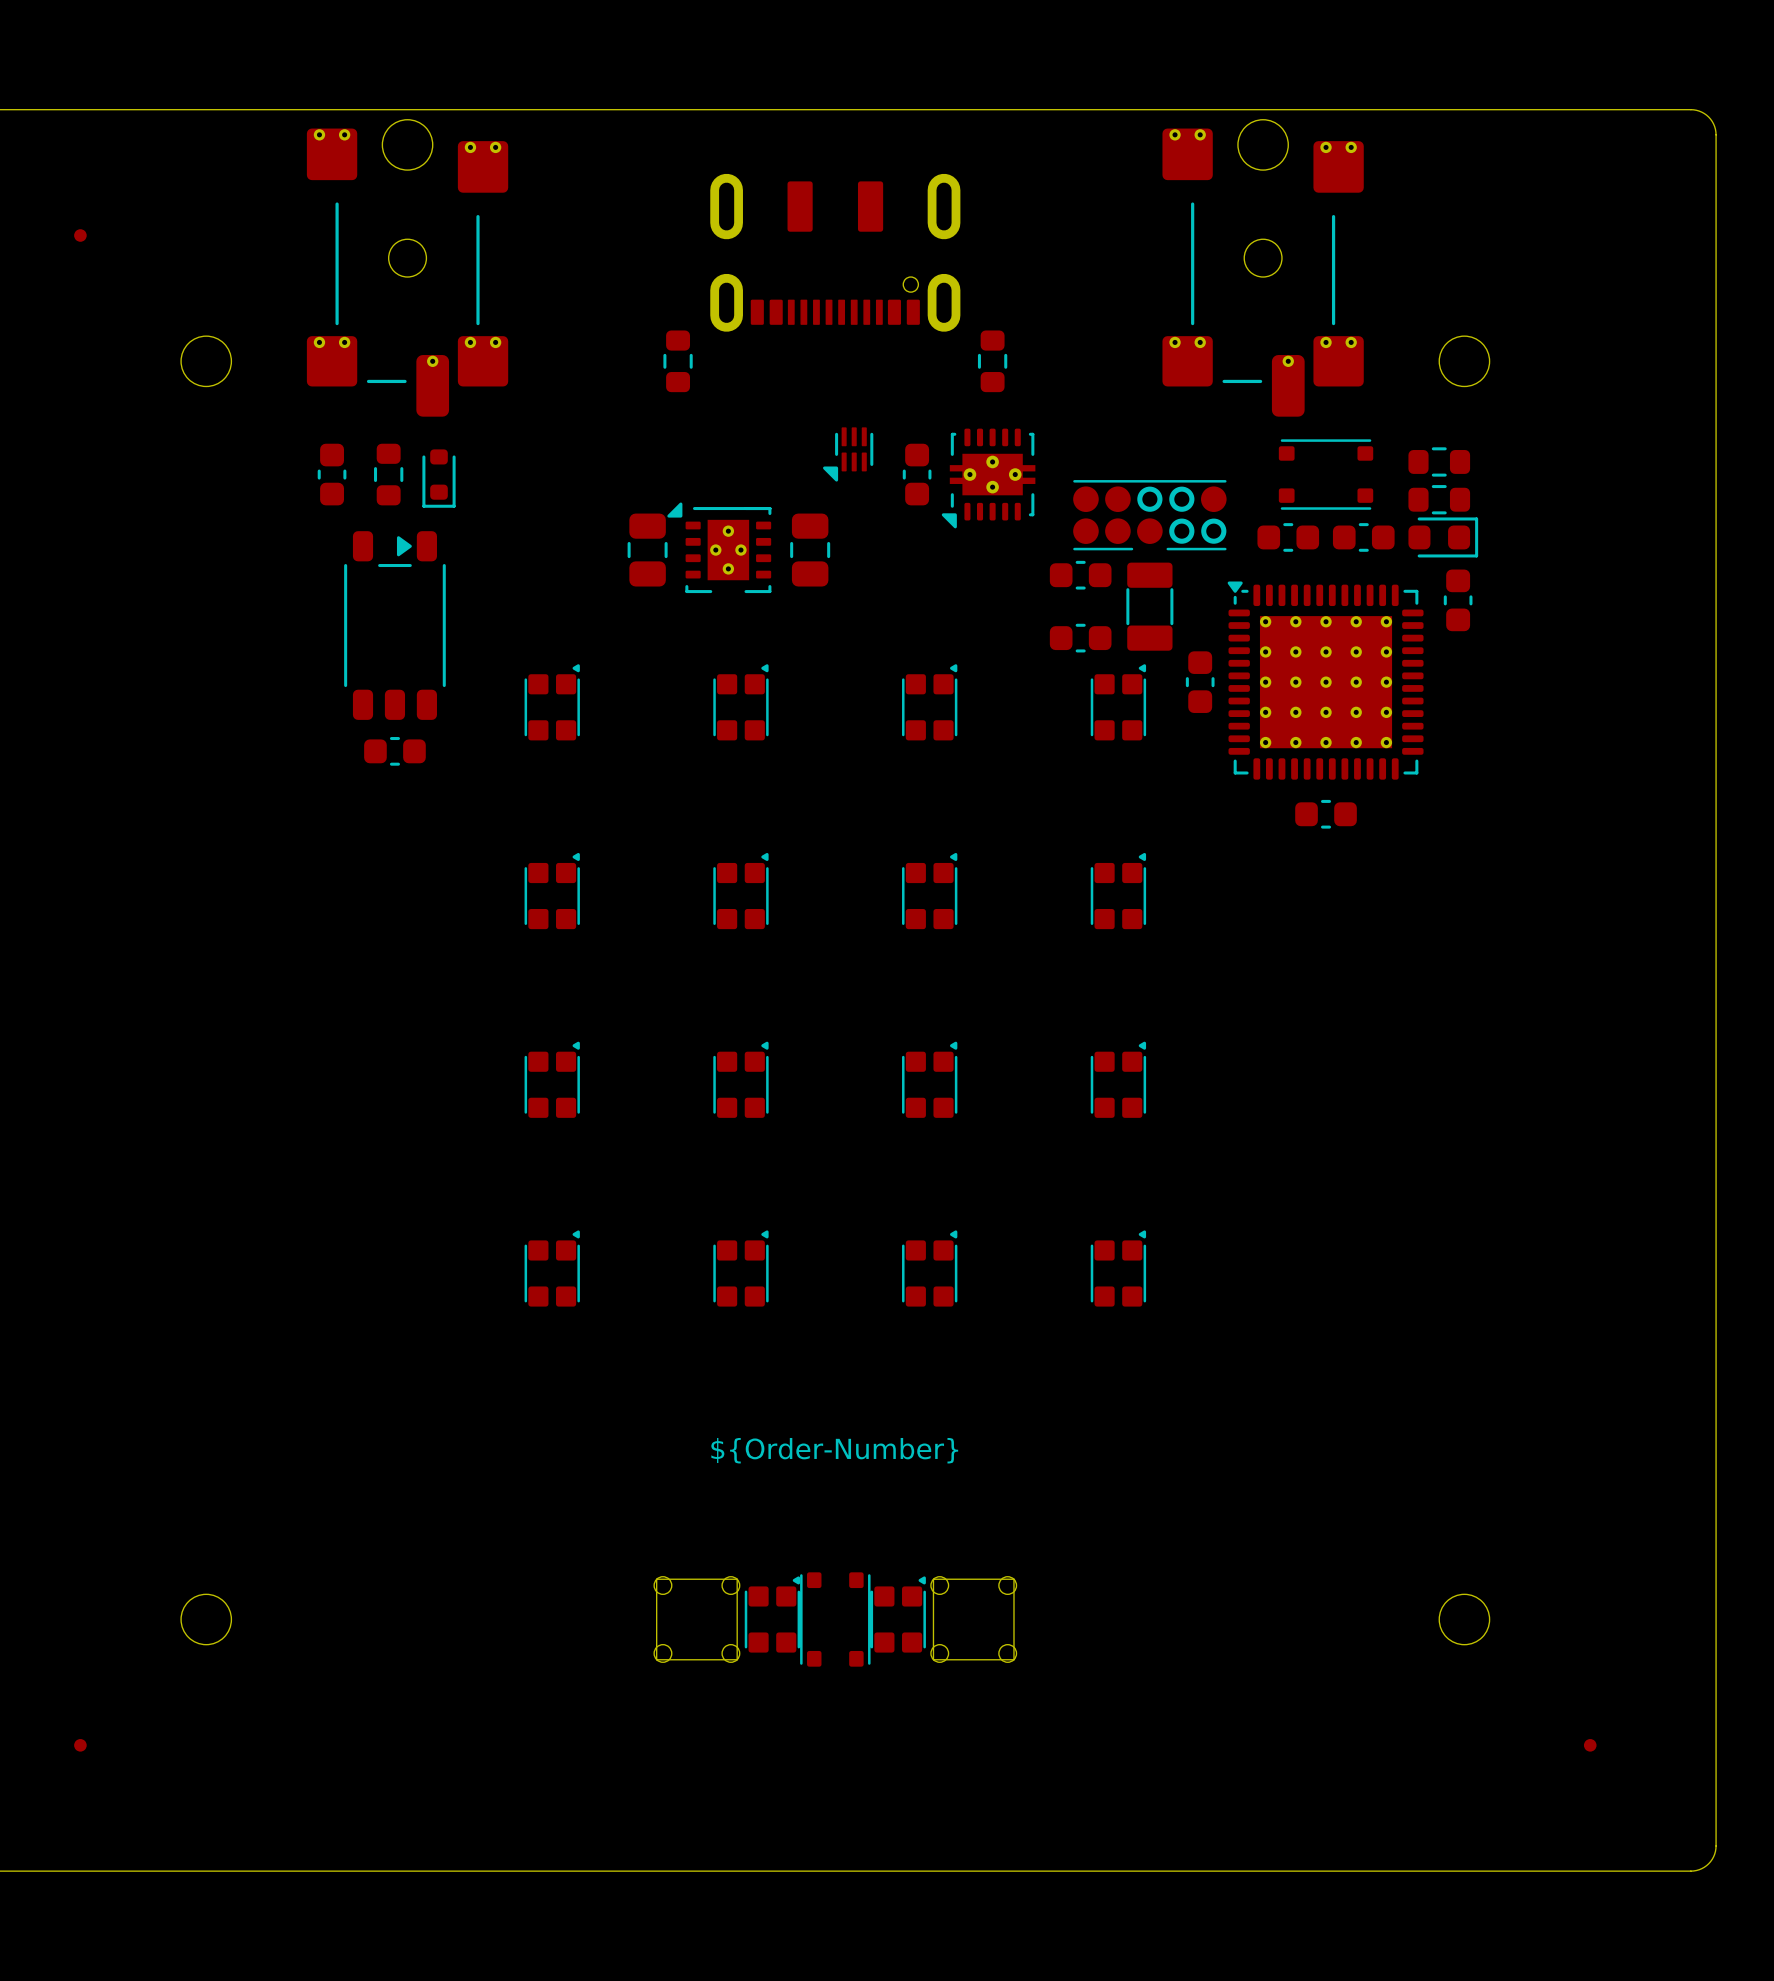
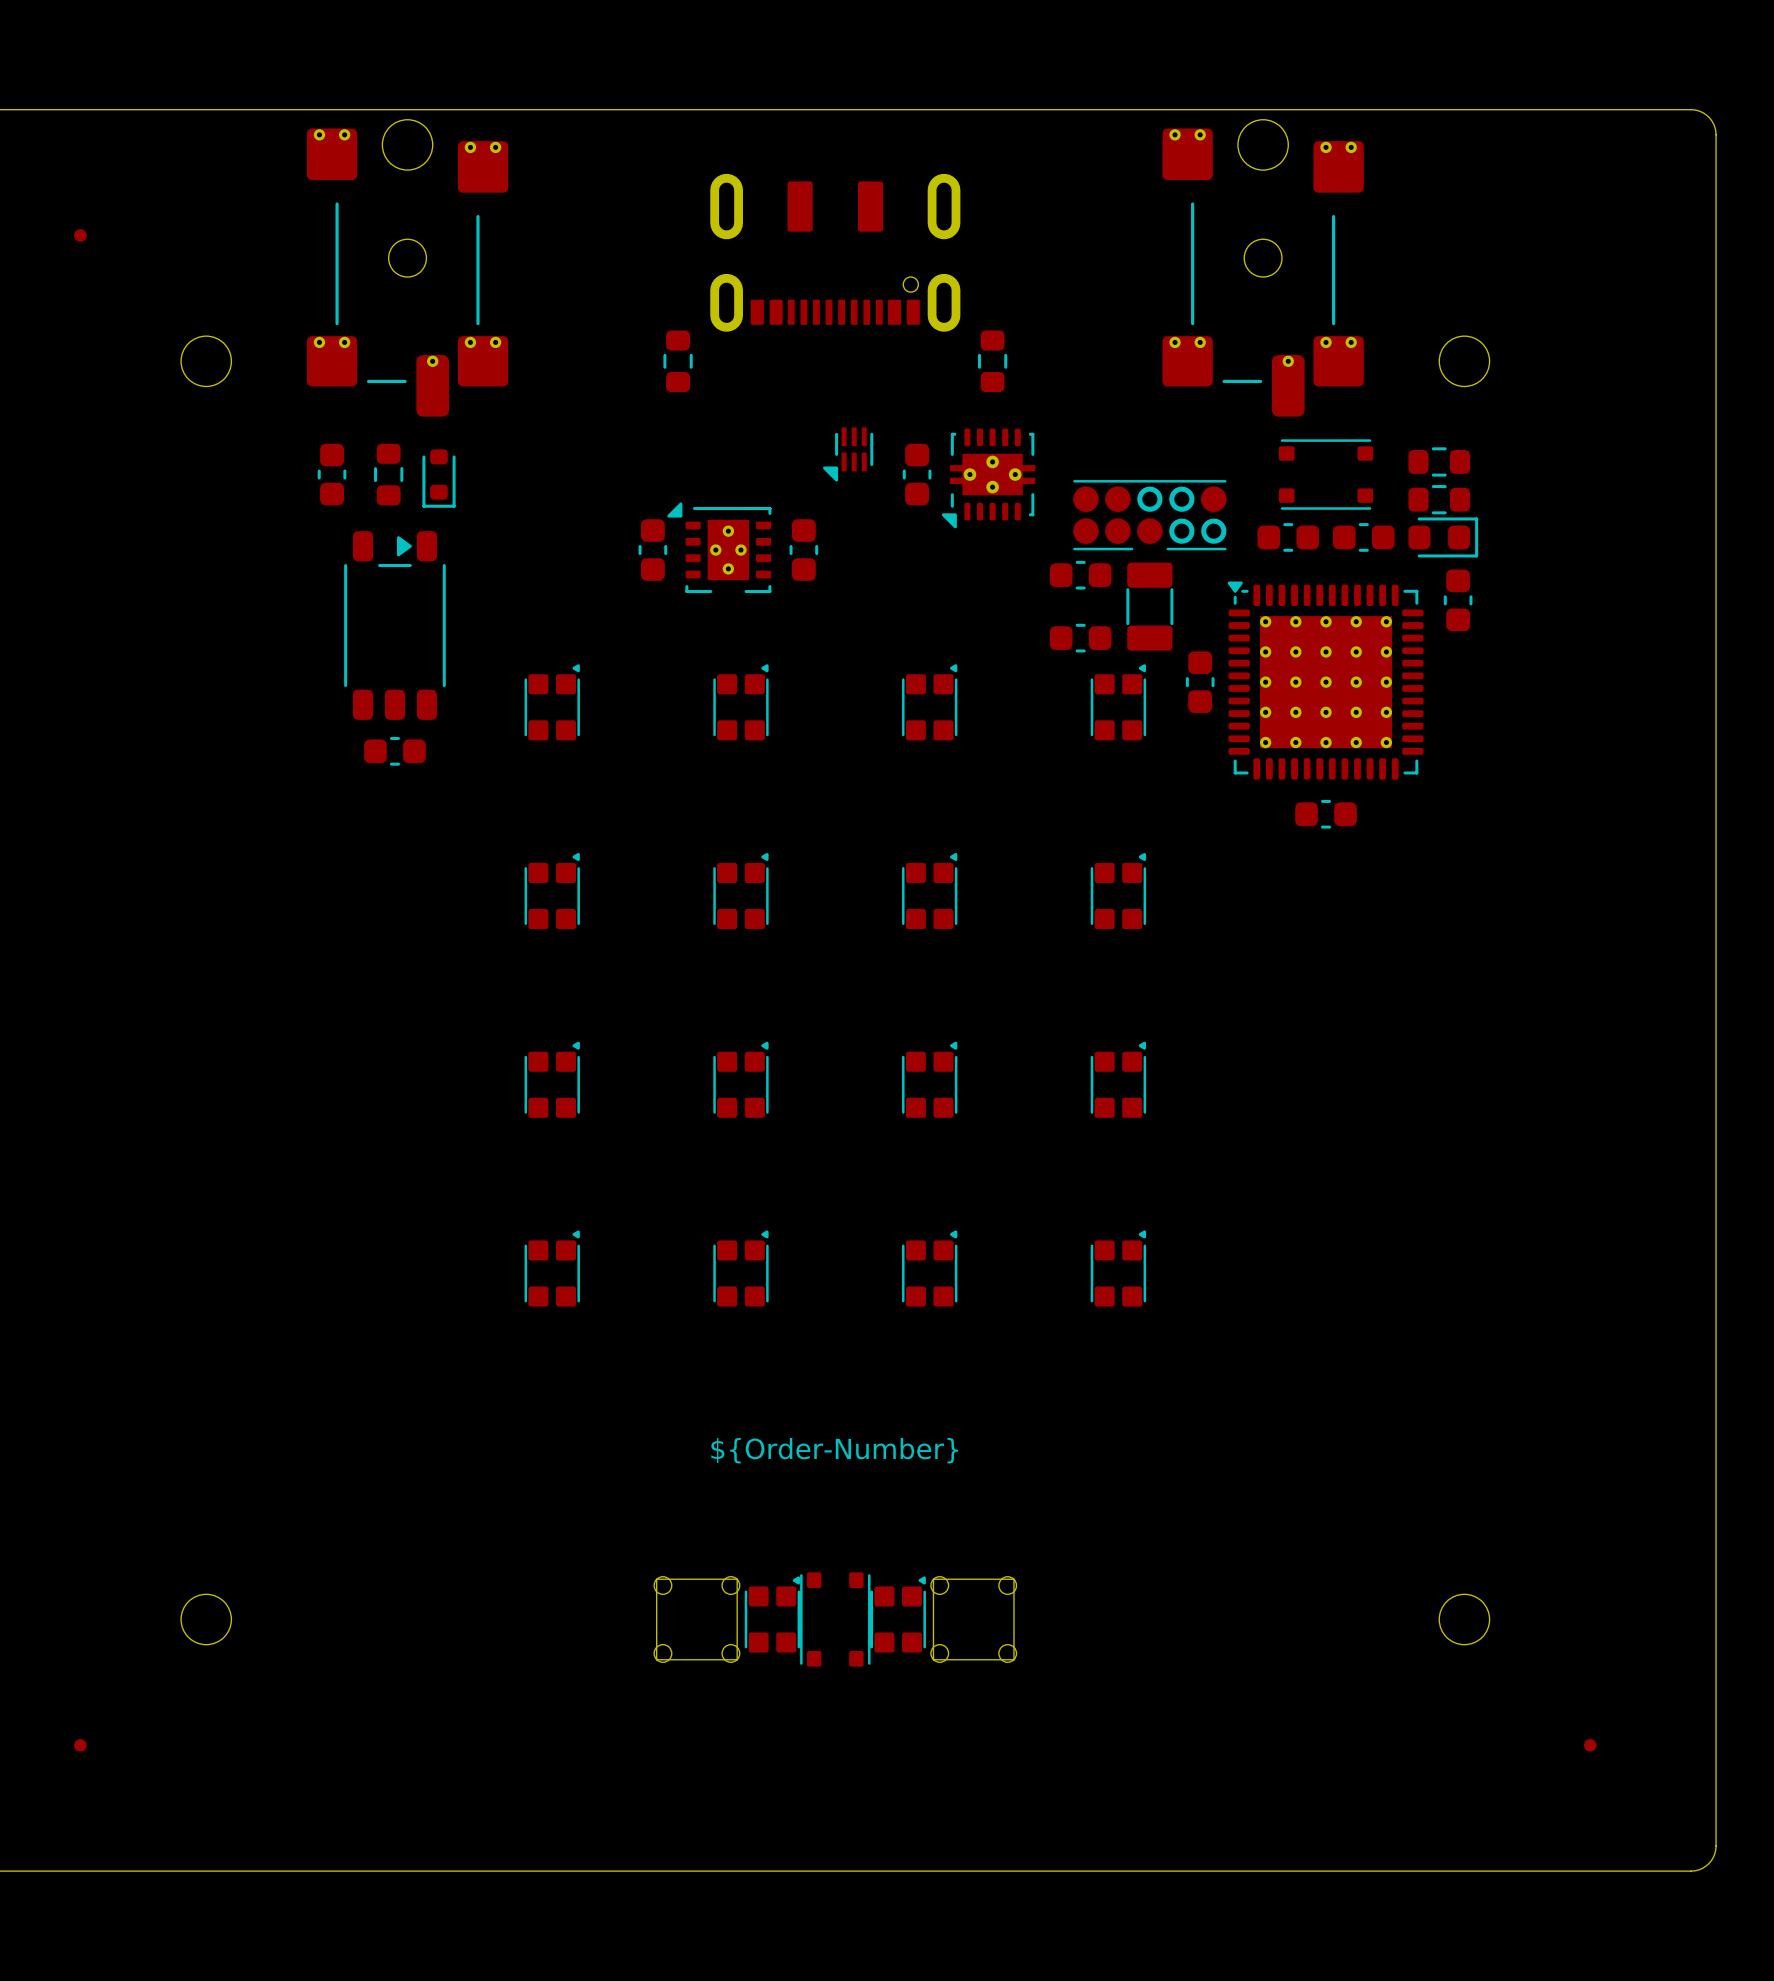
part footprint: [627, 513, 668, 587] -> [638, 519, 668, 581]
part footprint: [790, 513, 831, 587] -> [789, 519, 819, 581]

